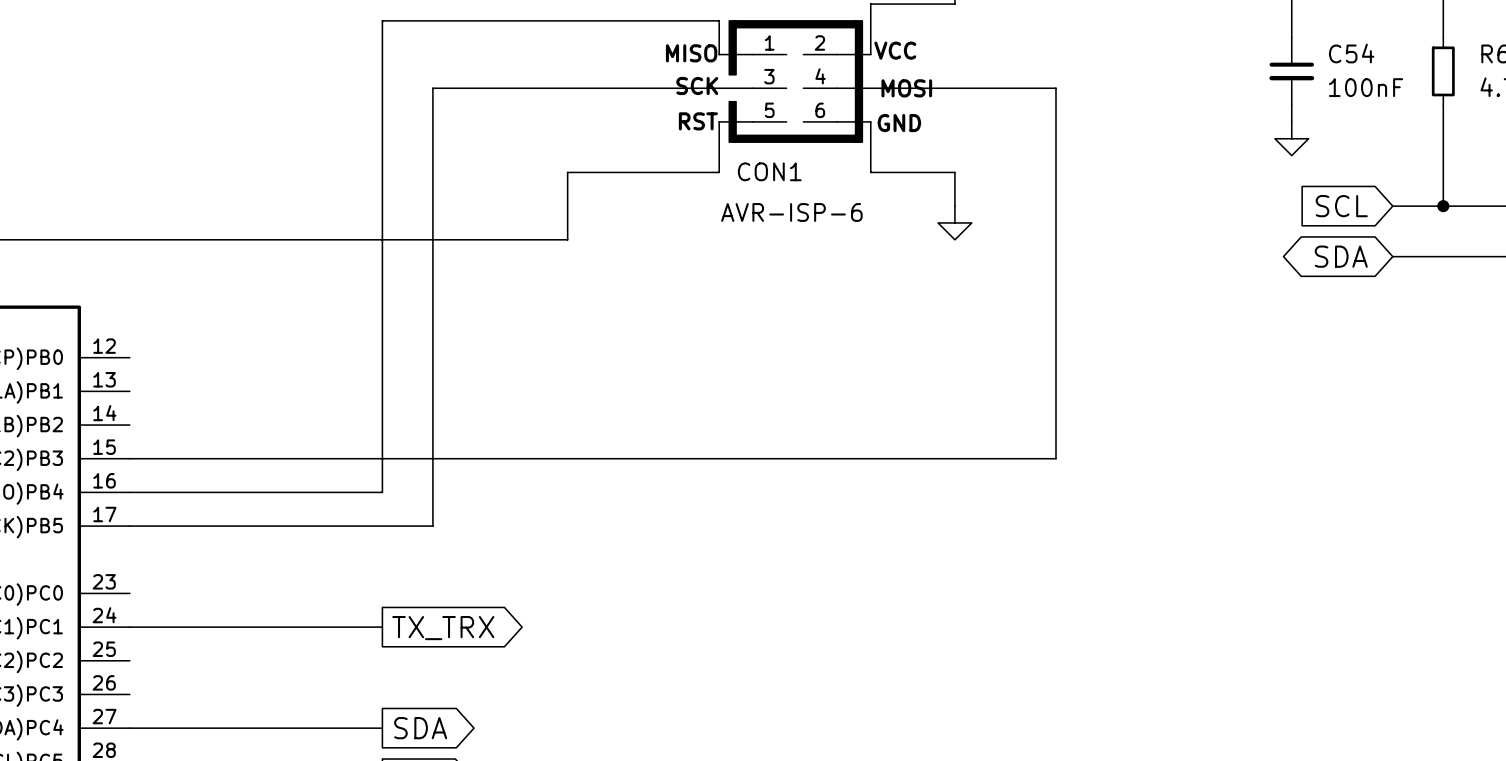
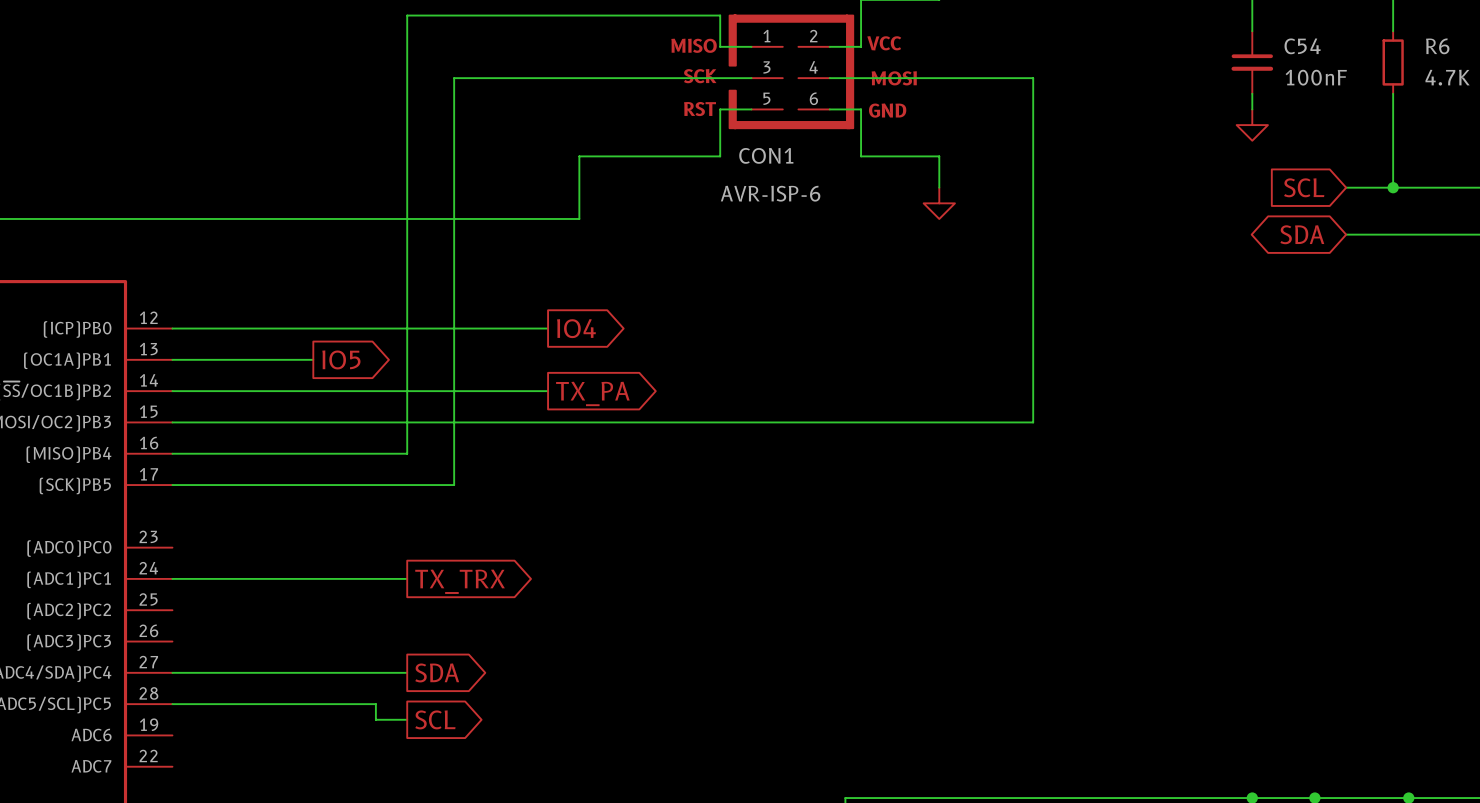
wire: none -> (172, 328) (548, 328)
global label: none -> IO4 (576, 328)
wire: none -> (172, 359) (313, 359)
global label: none -> IO5 (341, 359)
wire: none -> (172, 391) (548, 391)
global label: none -> TX_PA (592, 393)

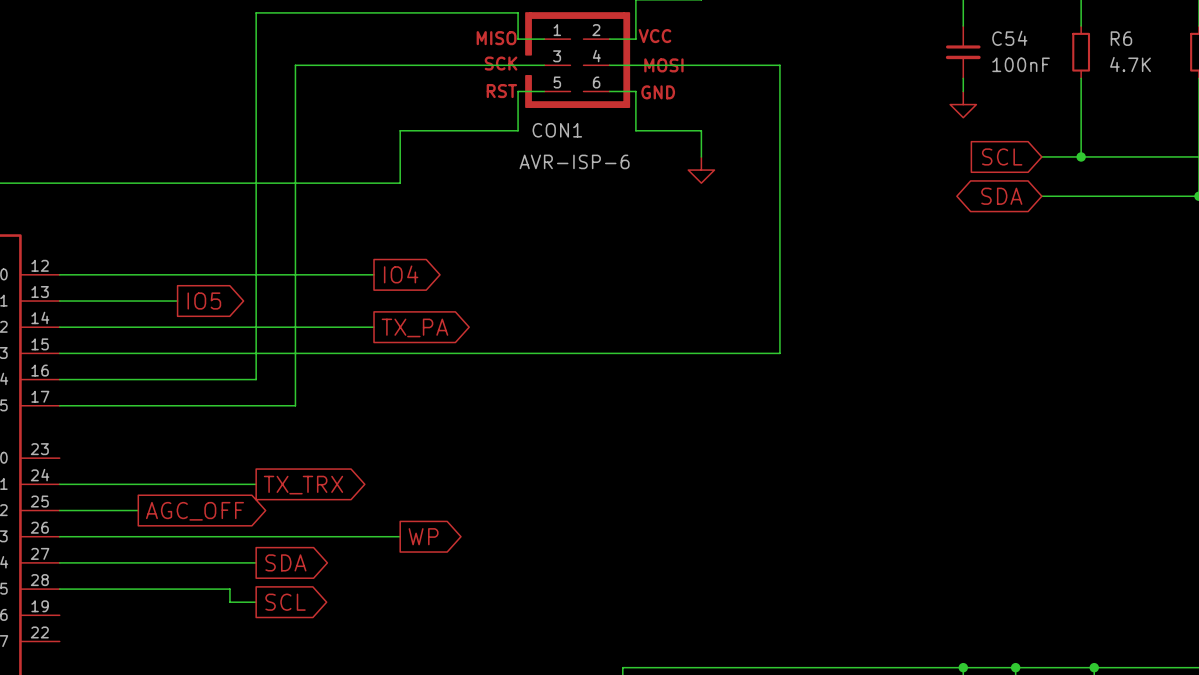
wire: none -> (59, 510) (138, 510)
global label: none -> AGC_OFF (194, 511)
wire: none -> (59, 536) (400, 536)
global label: none -> WP (423, 536)

